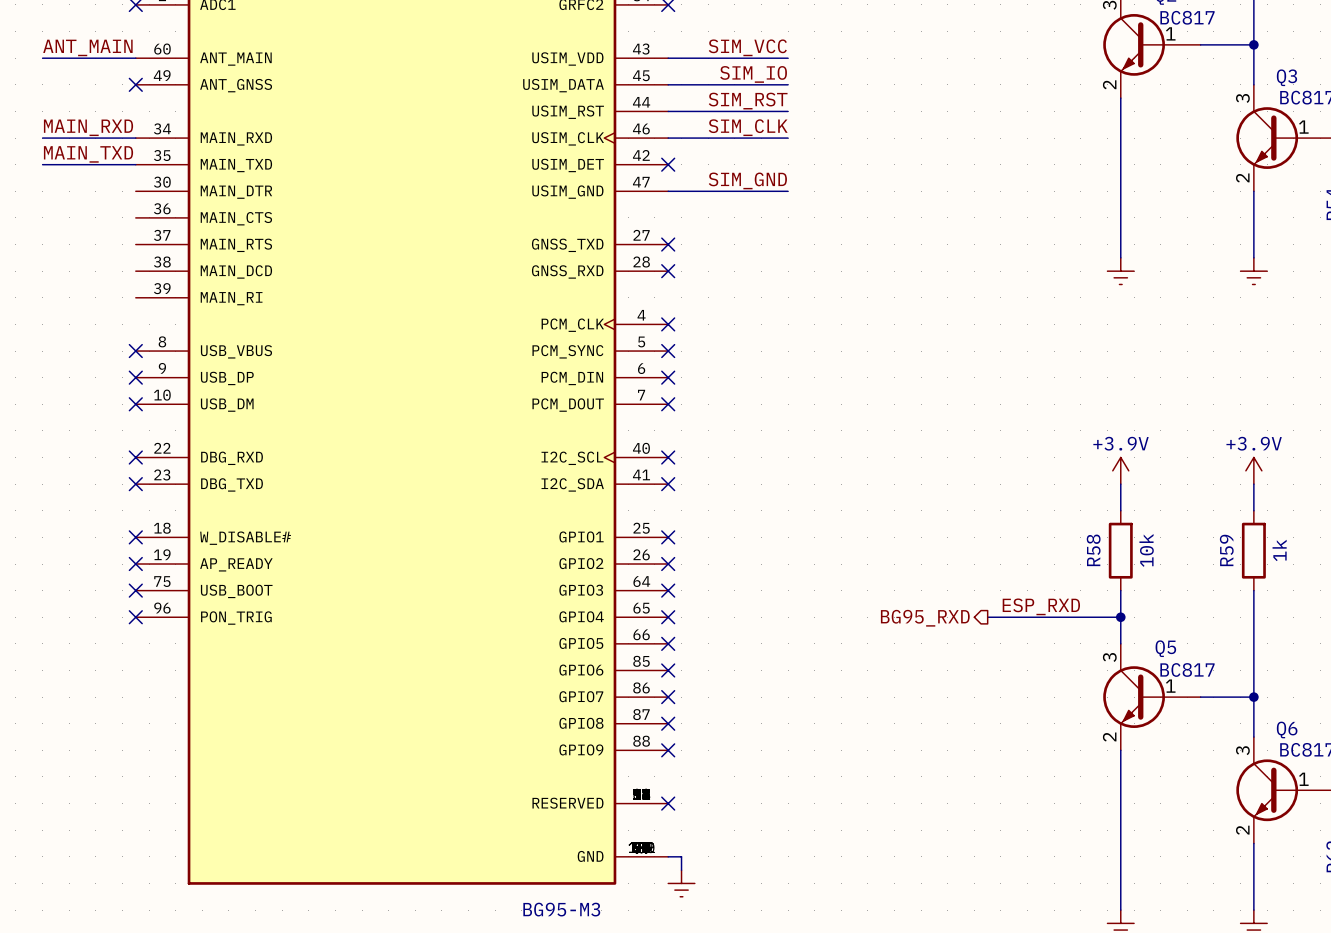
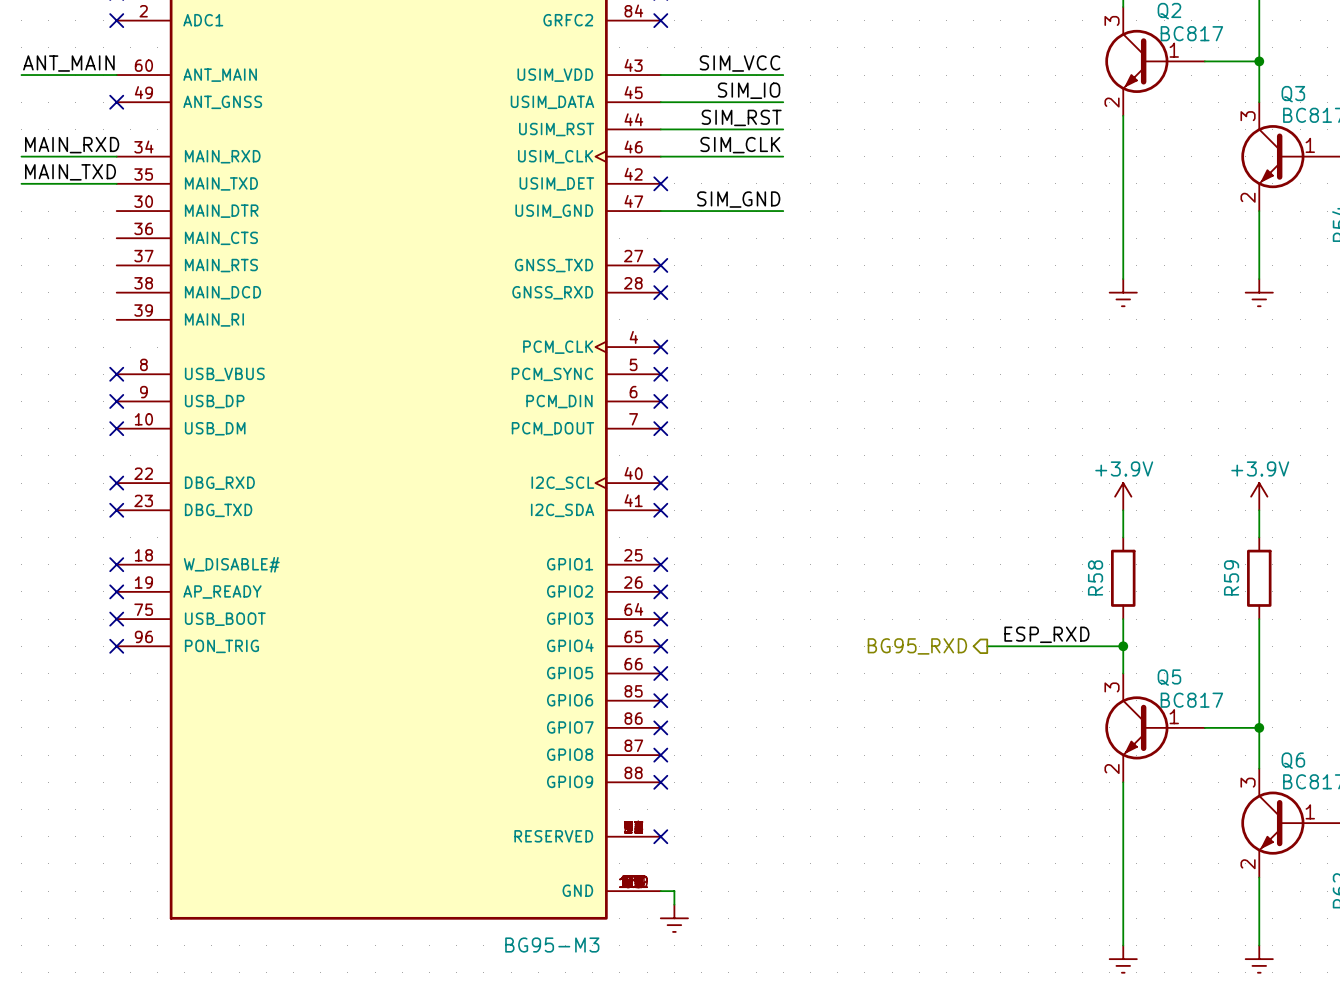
R58 value: 10k (1146, 550) -> none
R59 value: 1k (1279, 550) -> none

